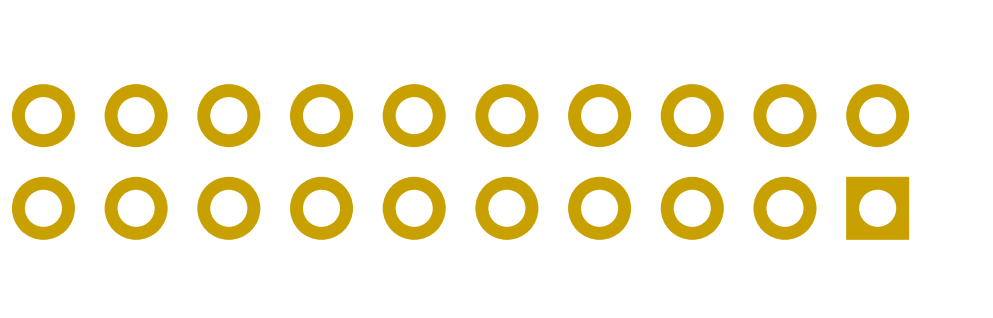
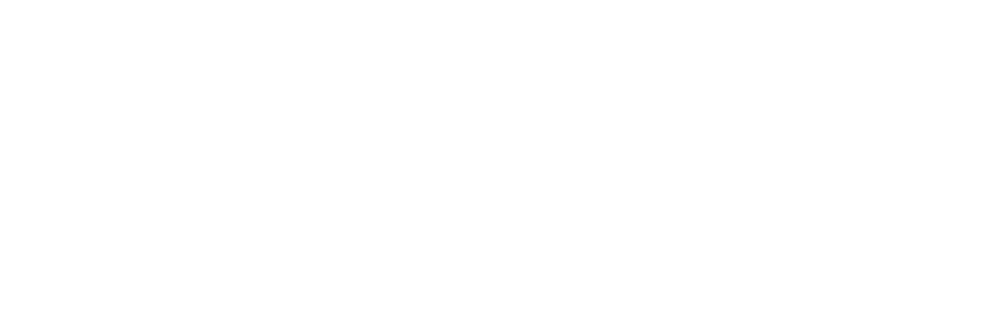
part: (460, 161) -> none

